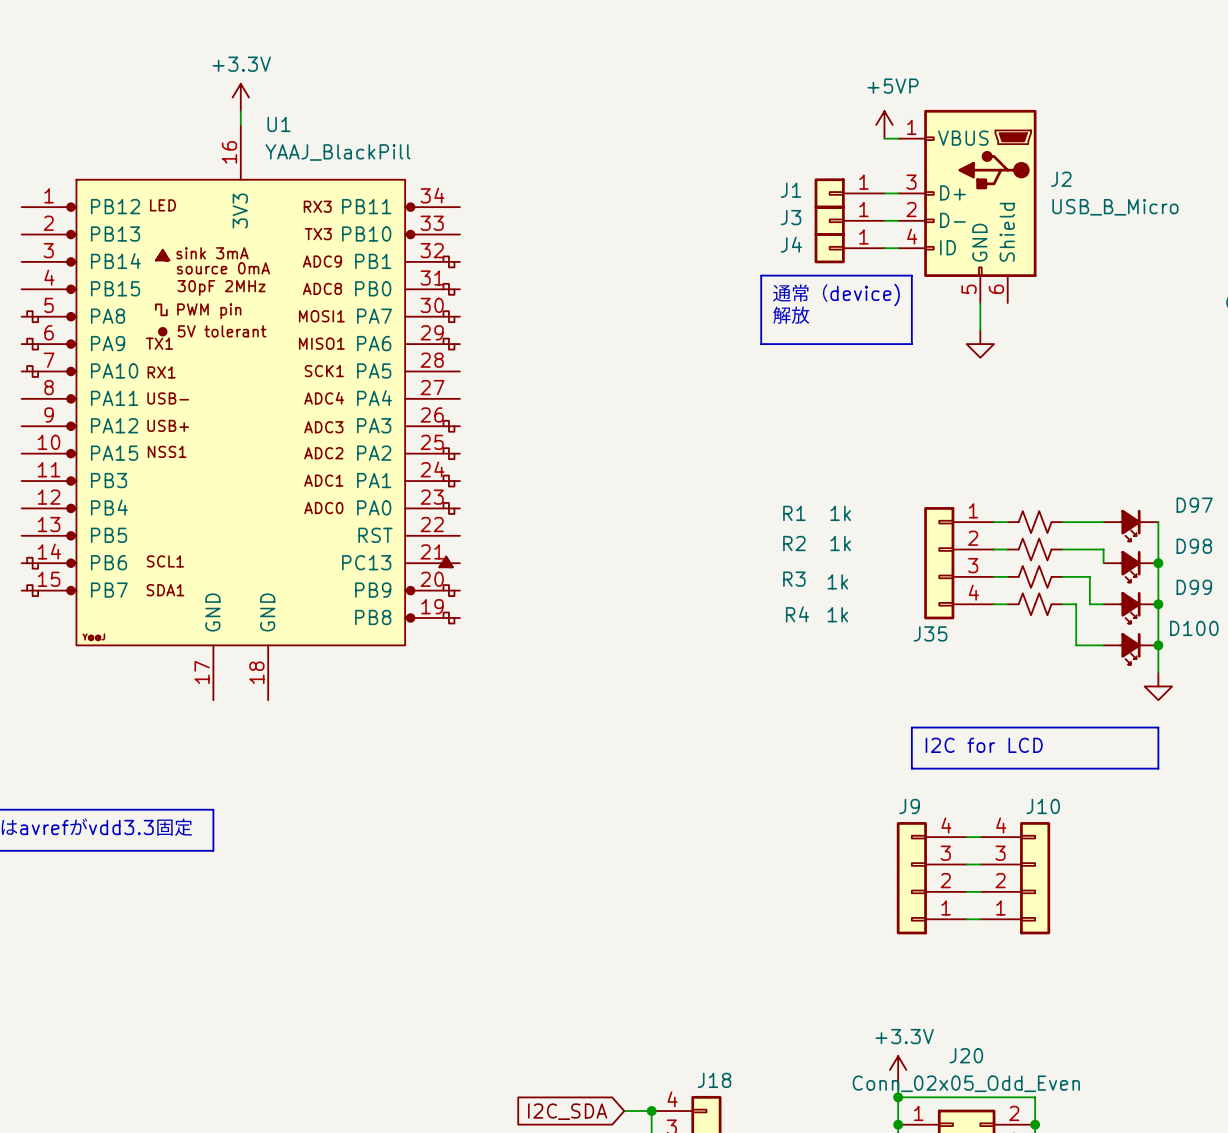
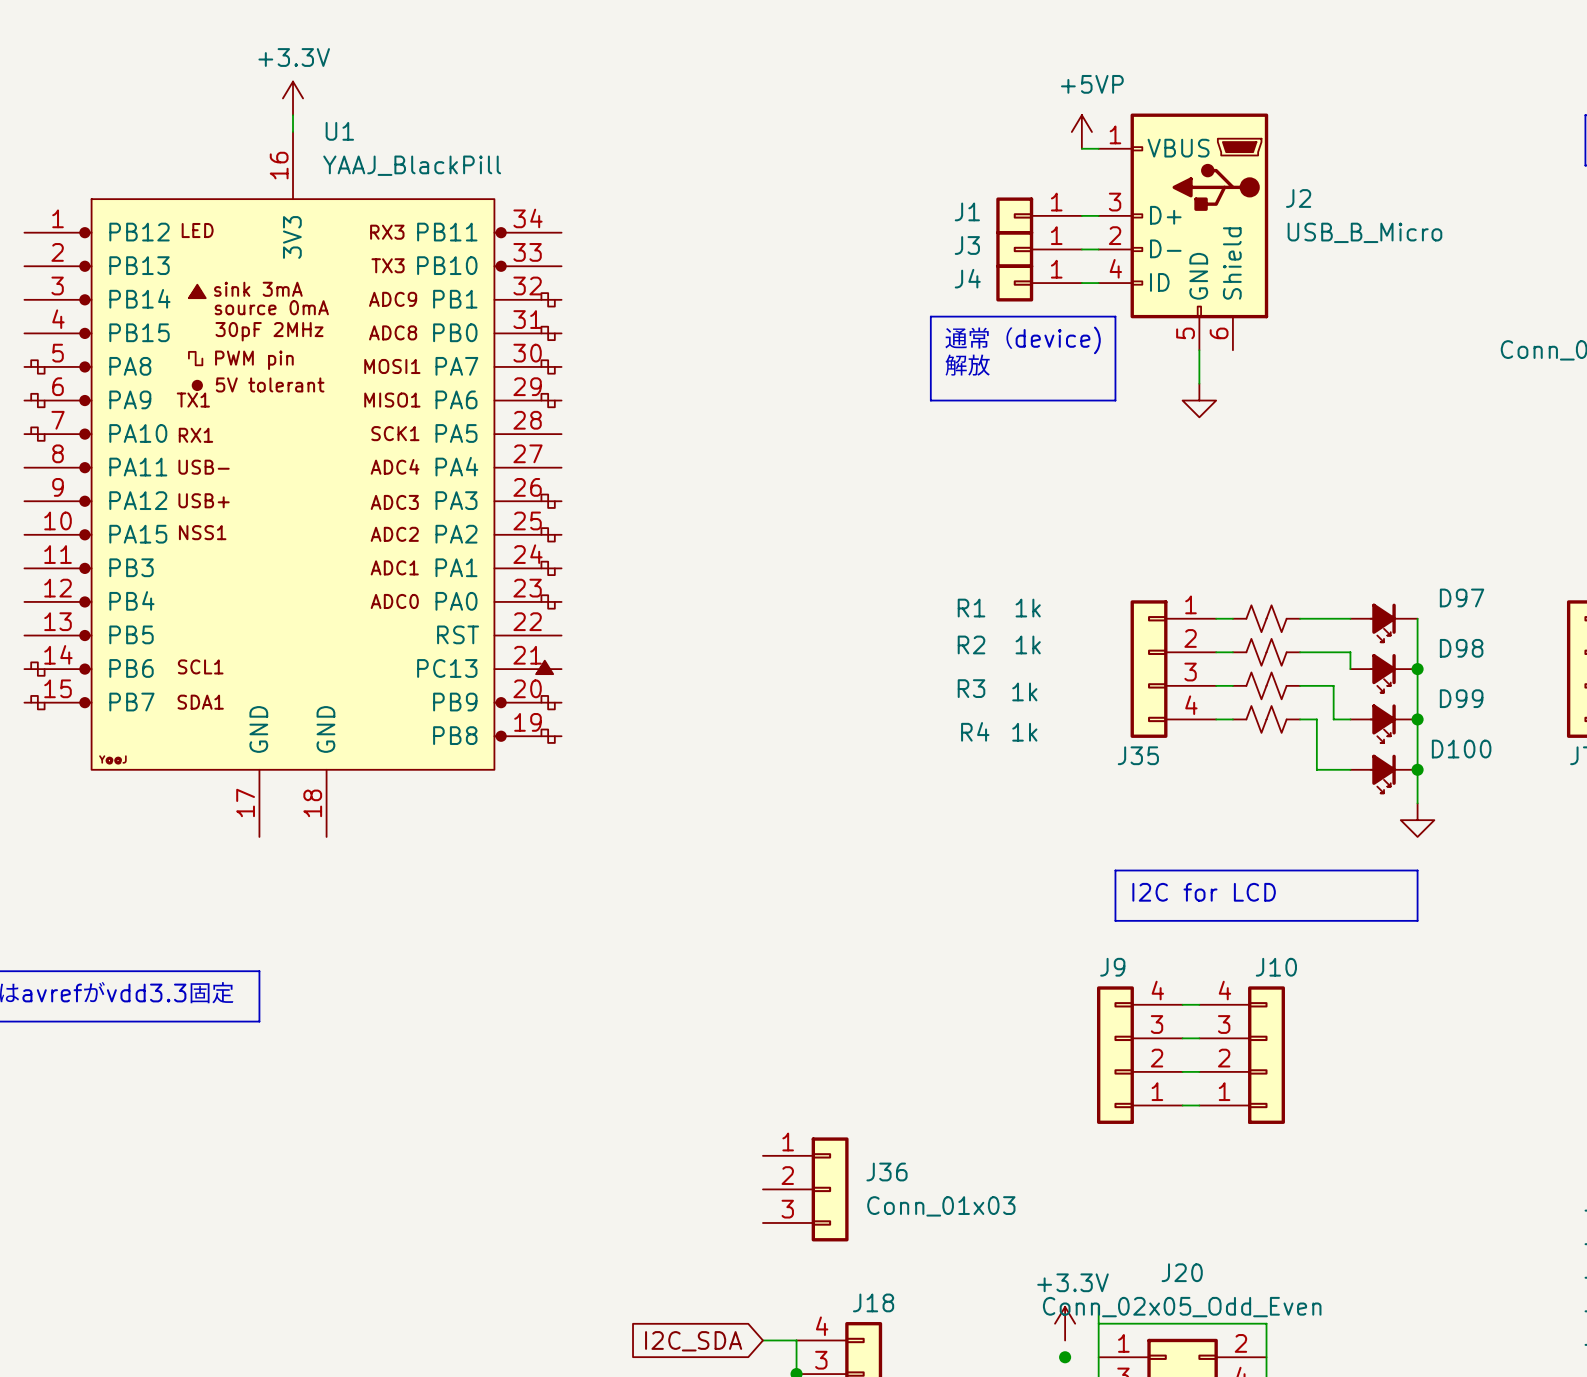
J36: none -> Conn_01x03 (805, 1189)
power symbol position: +3.3V (898, 1069) -> +3.3V (1065, 1323)
junction: (898, 1097) -> none
junction: (651, 1111) -> none
junction: none -> (1065, 1357)
junction: (898, 1124) -> none
junction: (1035, 1124) -> none

